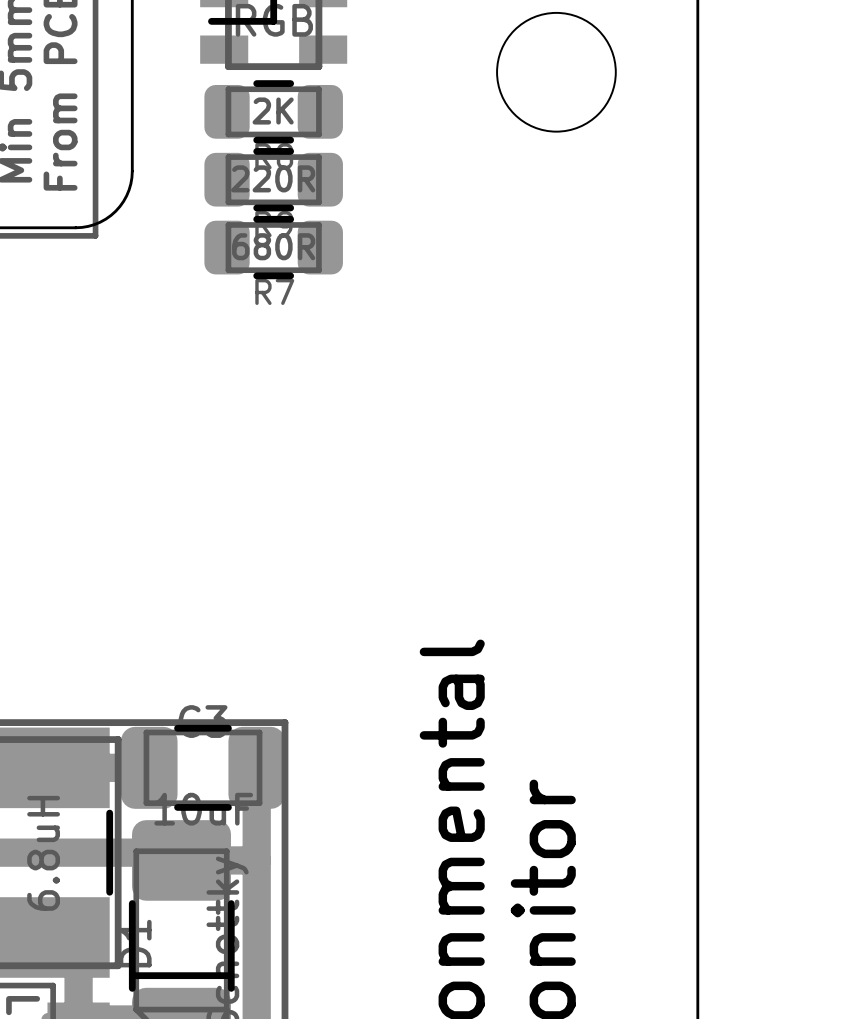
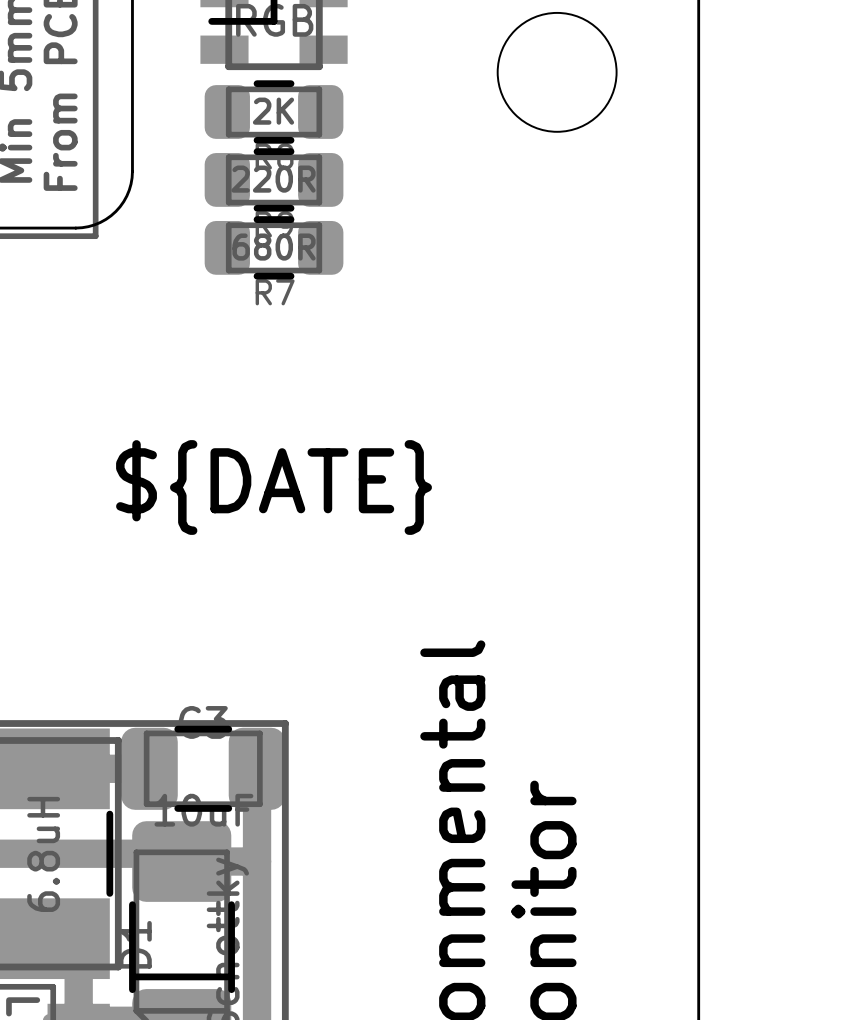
text: none -> ${DATE} (274, 487)

